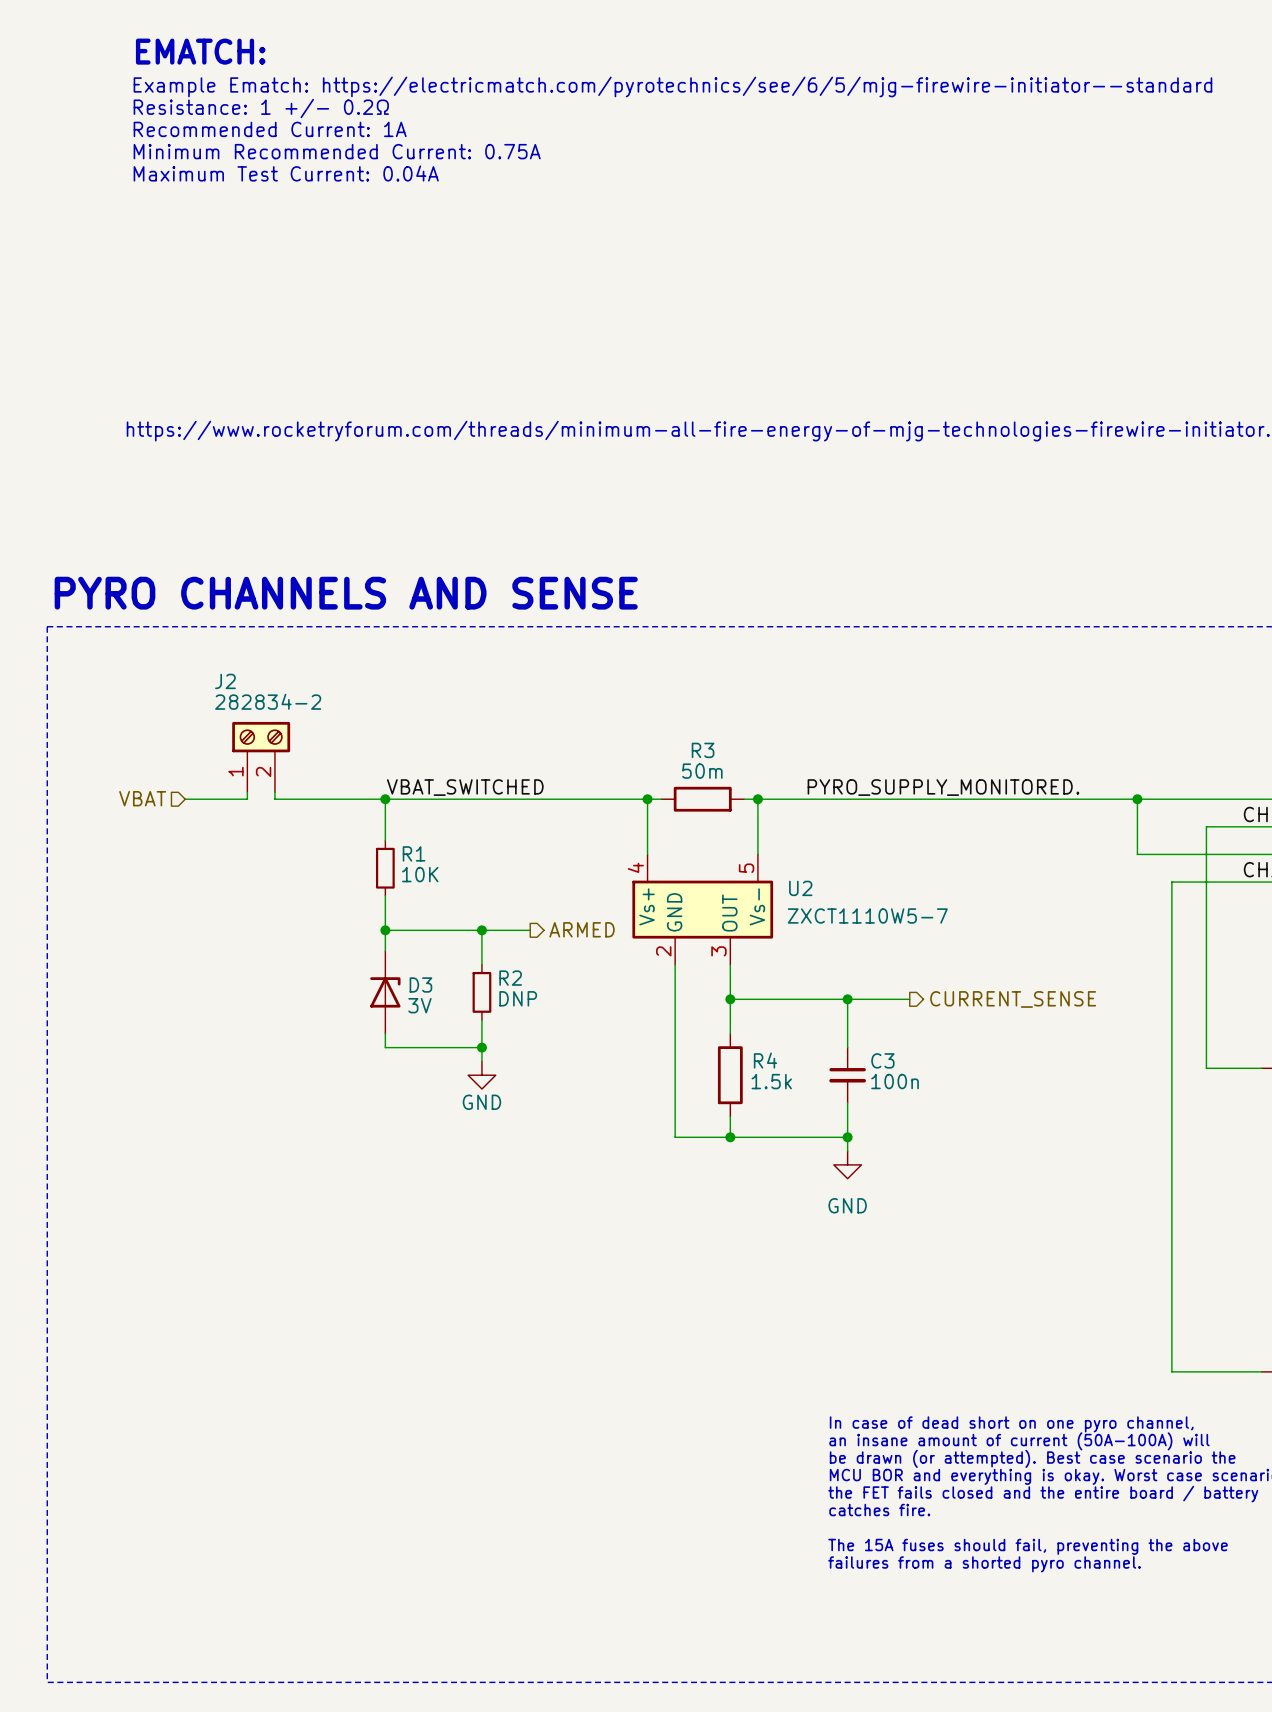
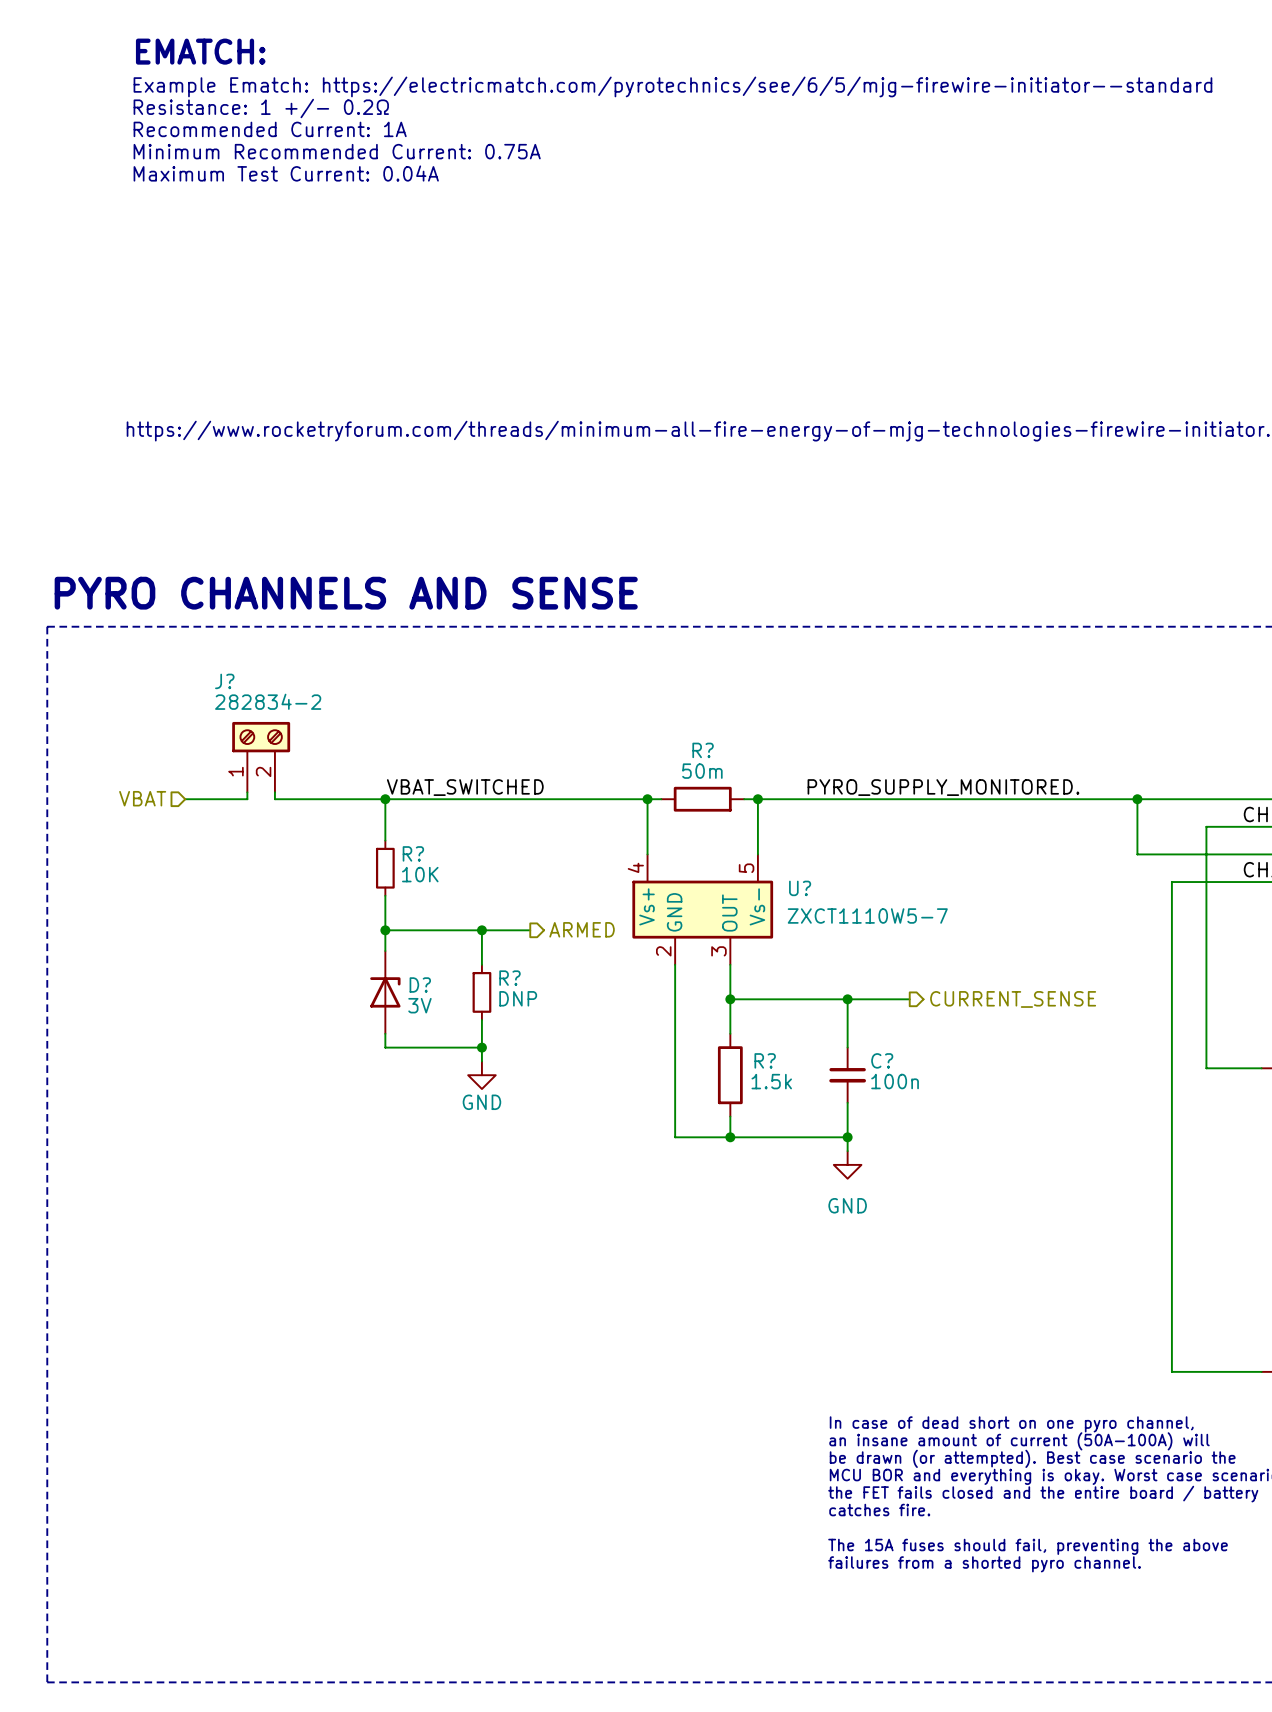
J2 name: J2 (225, 681) -> J? (224, 681)
R3 name: R3 (703, 750) -> R? (703, 750)
R1 name: R1 (414, 853) -> R? (413, 853)
U2 name: U2 (800, 888) -> U? (800, 888)
R2 name: R2 (510, 978) -> R? (509, 978)
D3 name: D3 (420, 985) -> D? (420, 985)
R4 name: R4 (765, 1060) -> R? (765, 1060)
C3 name: C3 (882, 1060) -> C? (882, 1060)

